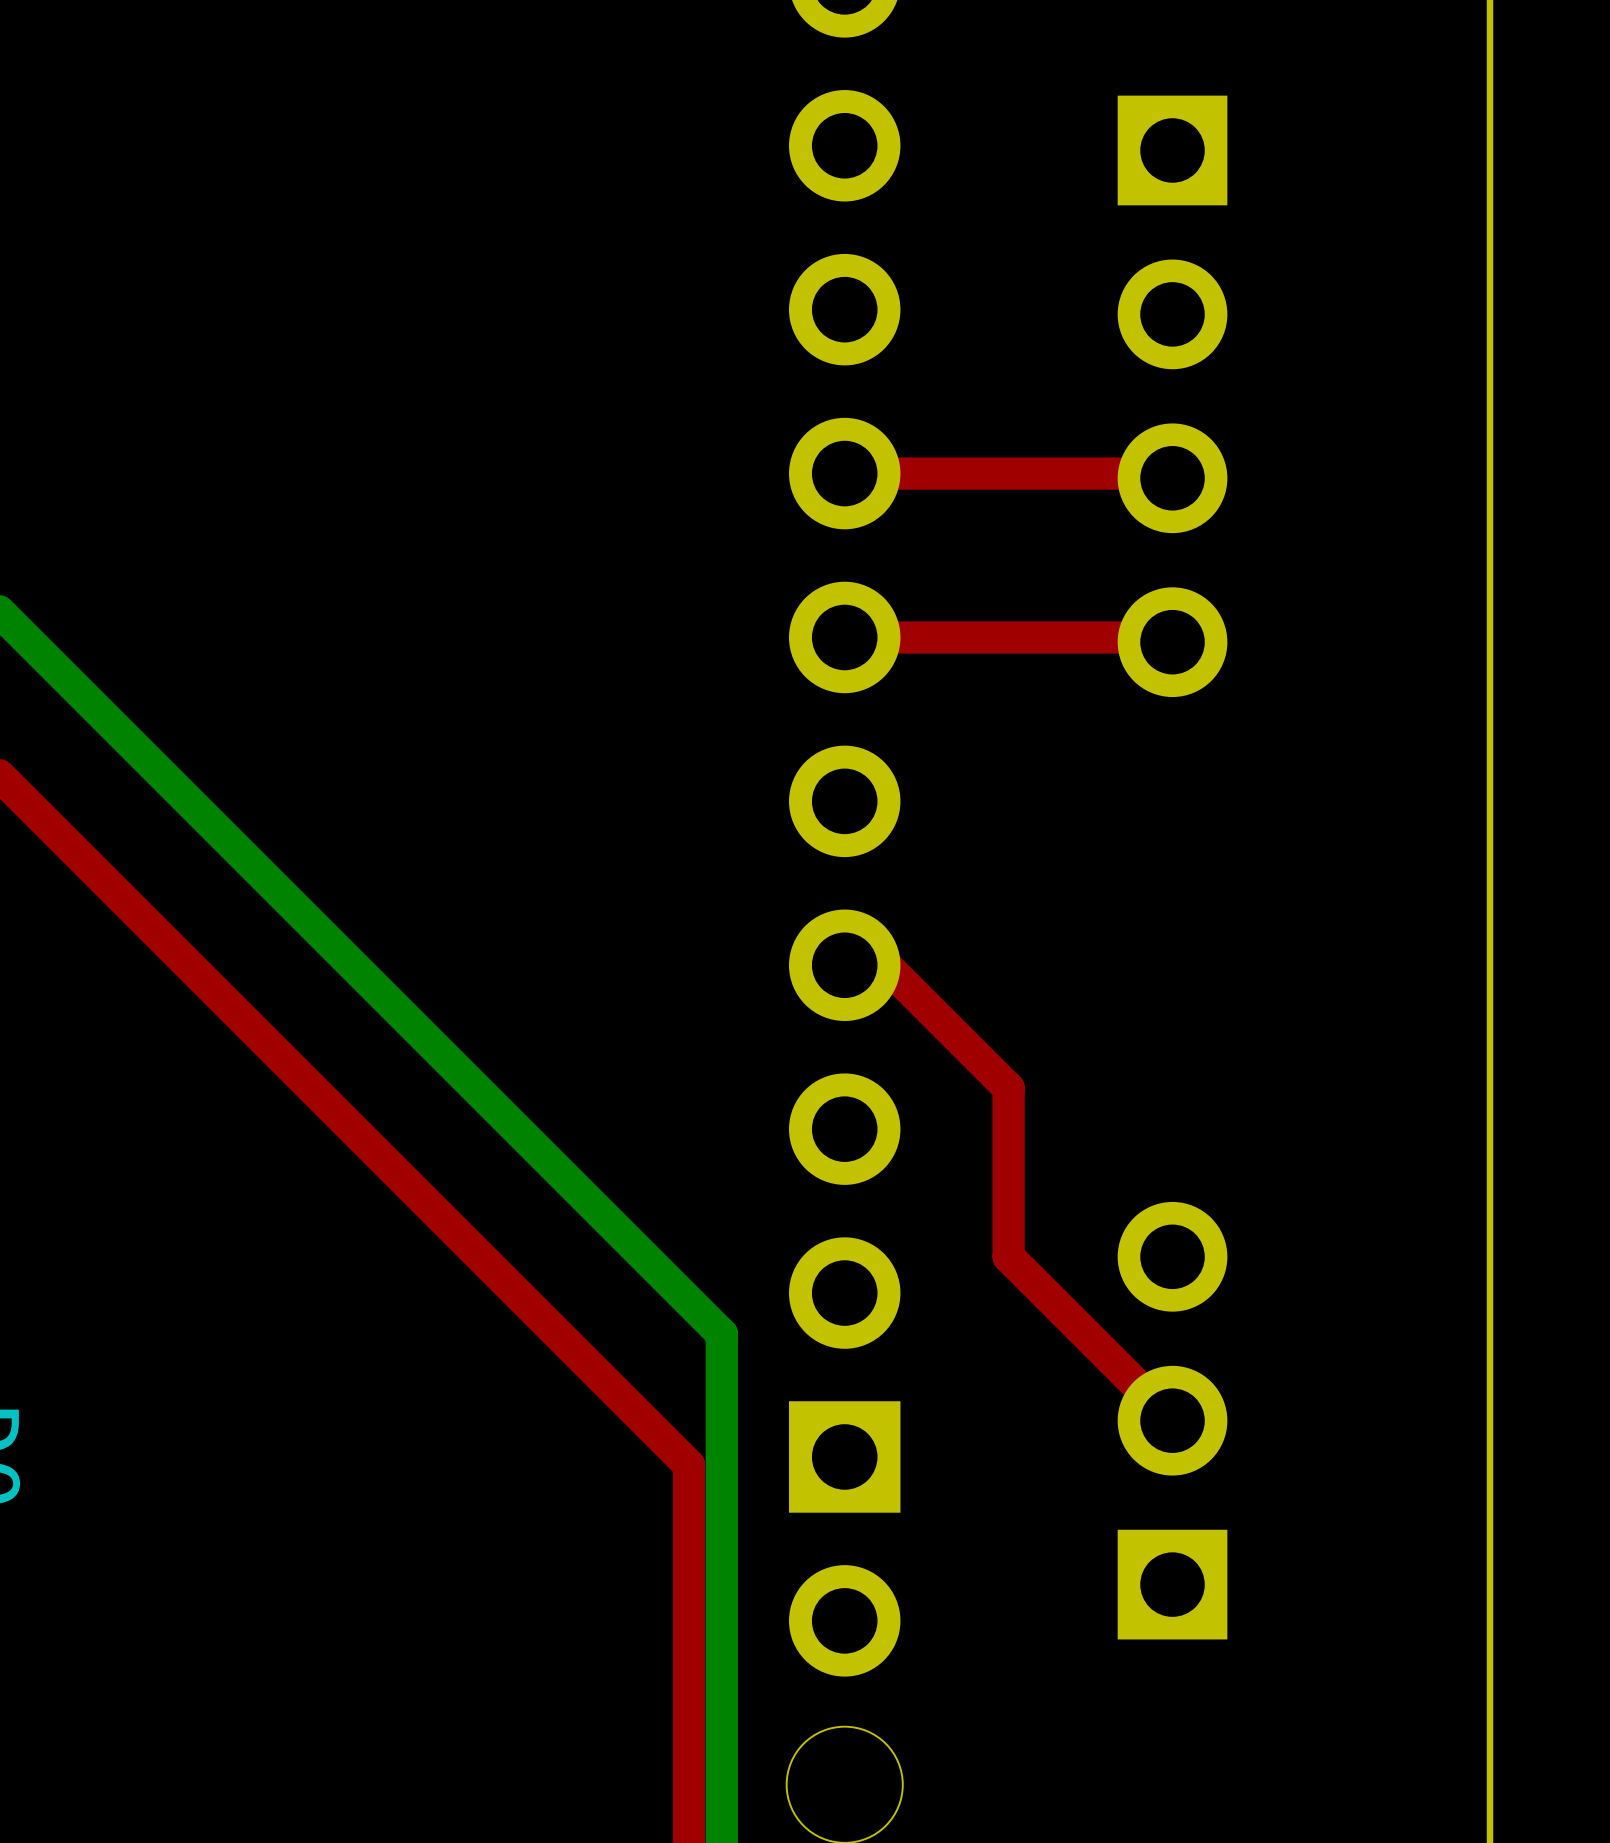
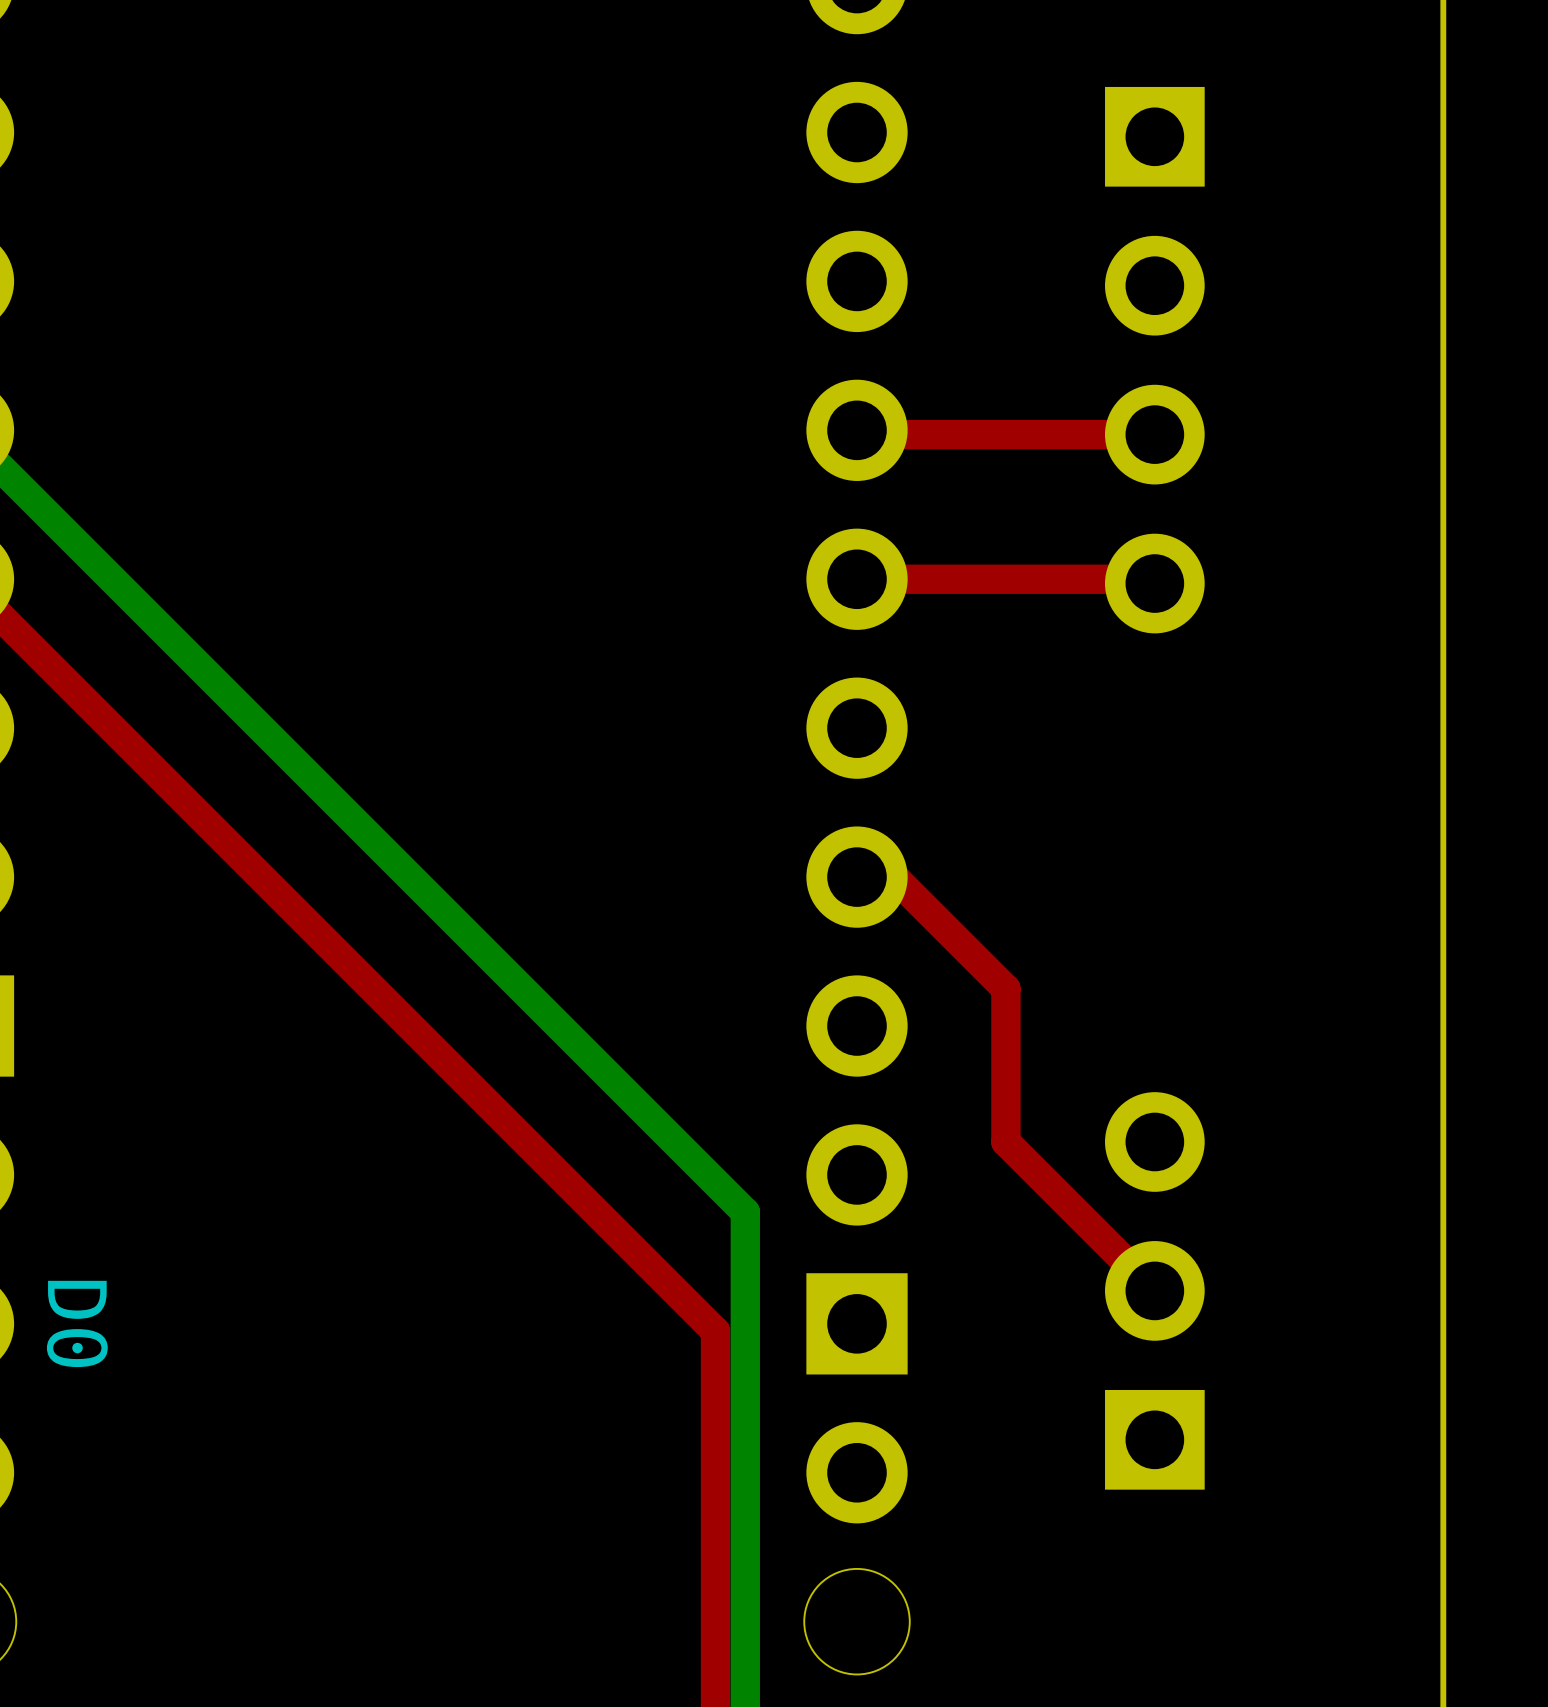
top track: (885, 473) (1167, 473) (1172, 478) -> (857, 430) (861, 434) (1154, 434)

